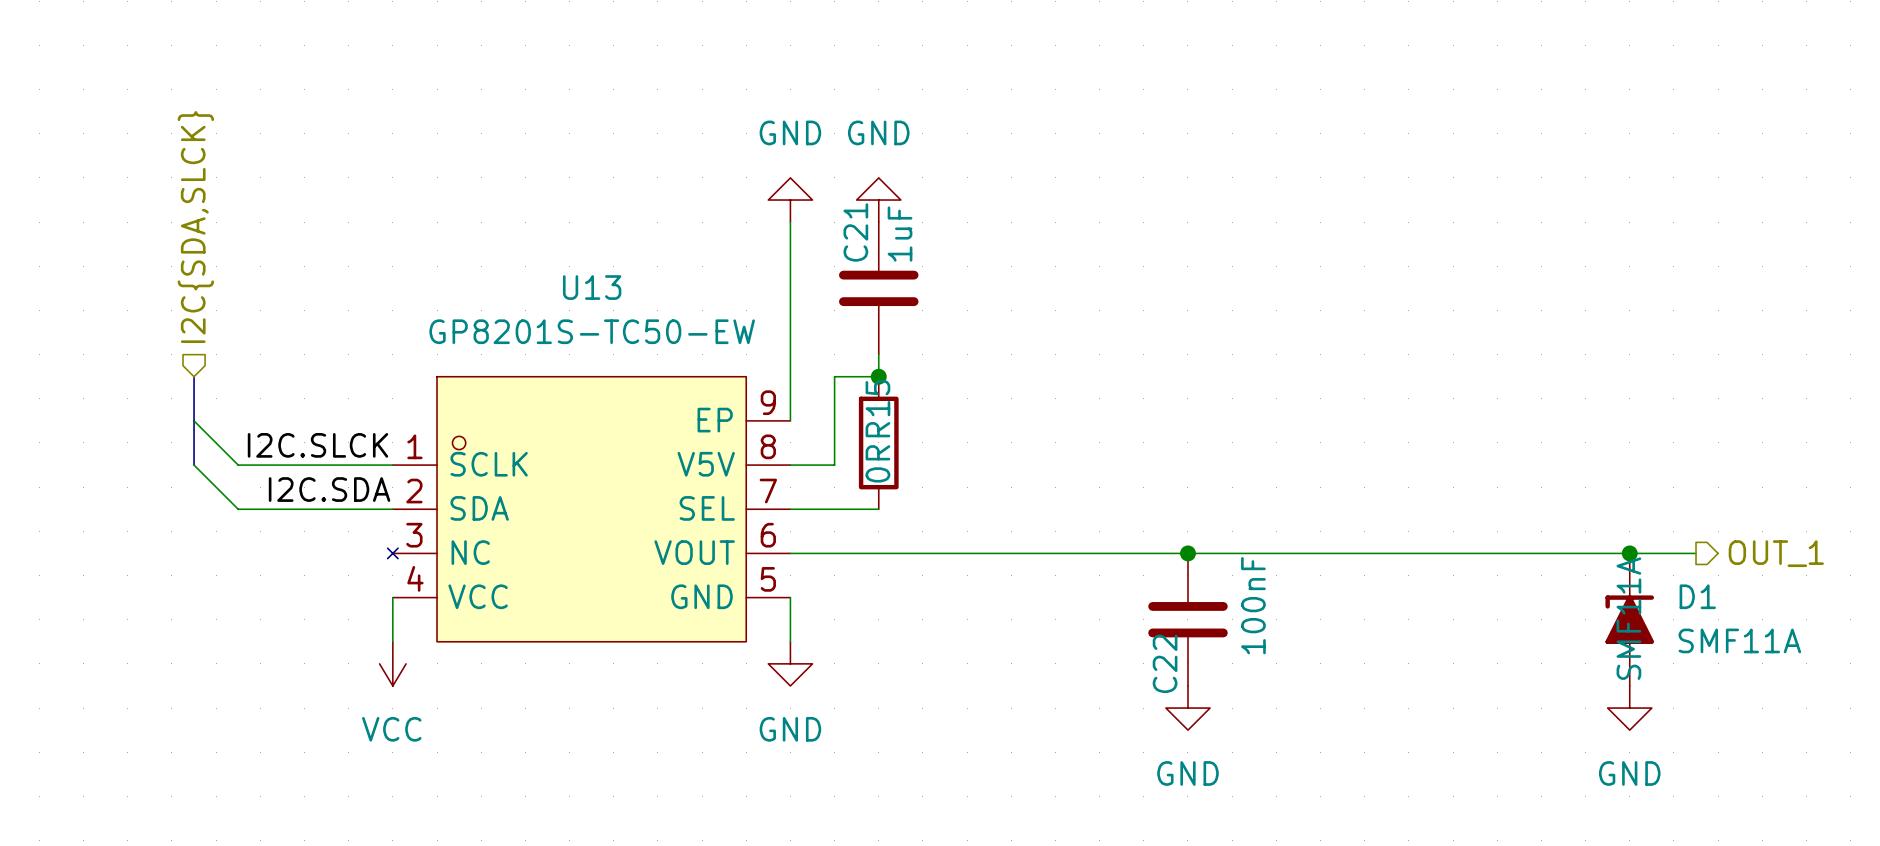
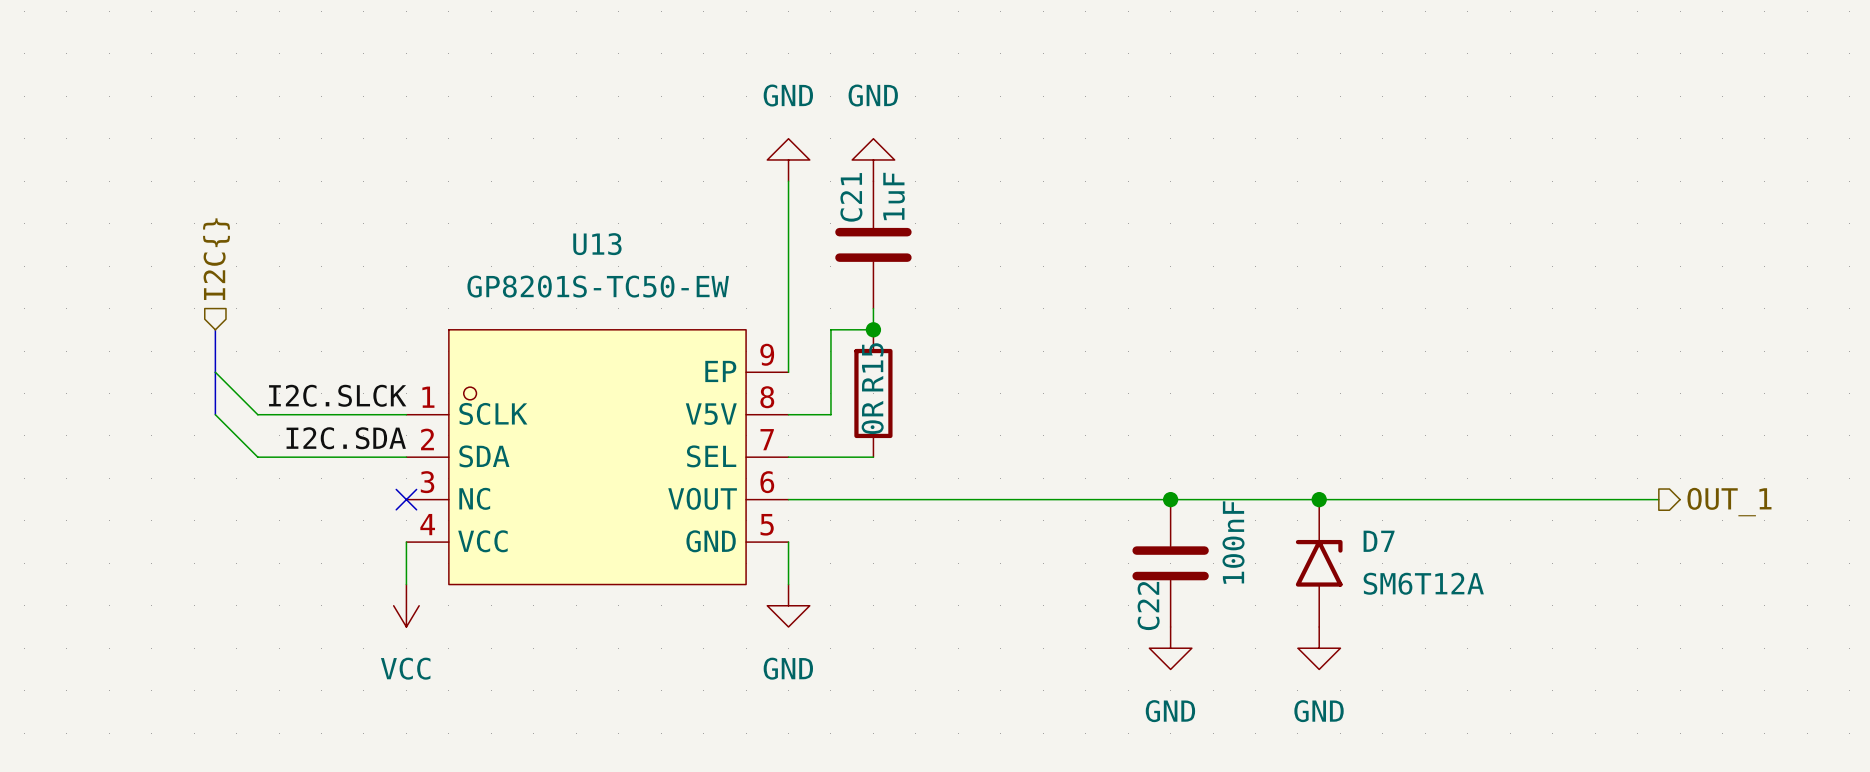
hierarchical label: I2C{SDA,SLCK} (195, 227) -> I2C{} (216, 259)
U13 symbol: [387, 376, 791, 642] -> [406, 329, 789, 585]
no-connect mark: none -> (406, 499)
junction: none -> (1319, 499)
junction: (1629, 553) -> none
D7: none -> SM6T12A (1319, 563)
D1: SMF11A (1629, 619) -> none
power symbol position: GND (1629, 708) -> GND (1319, 648)

